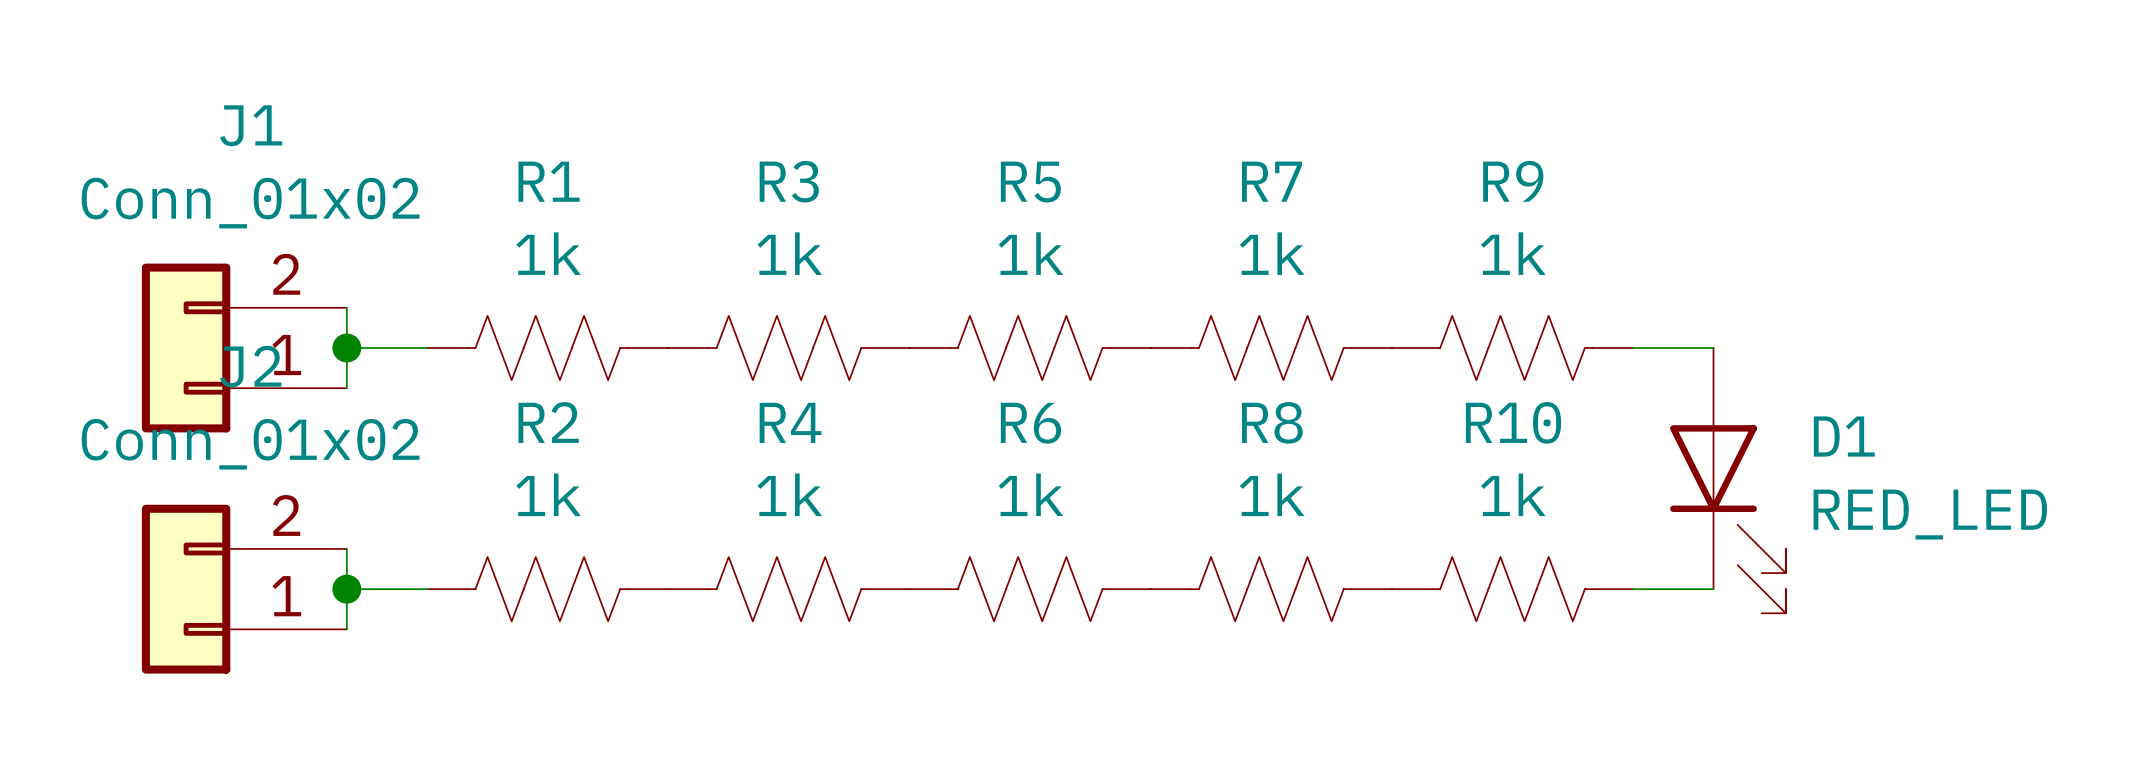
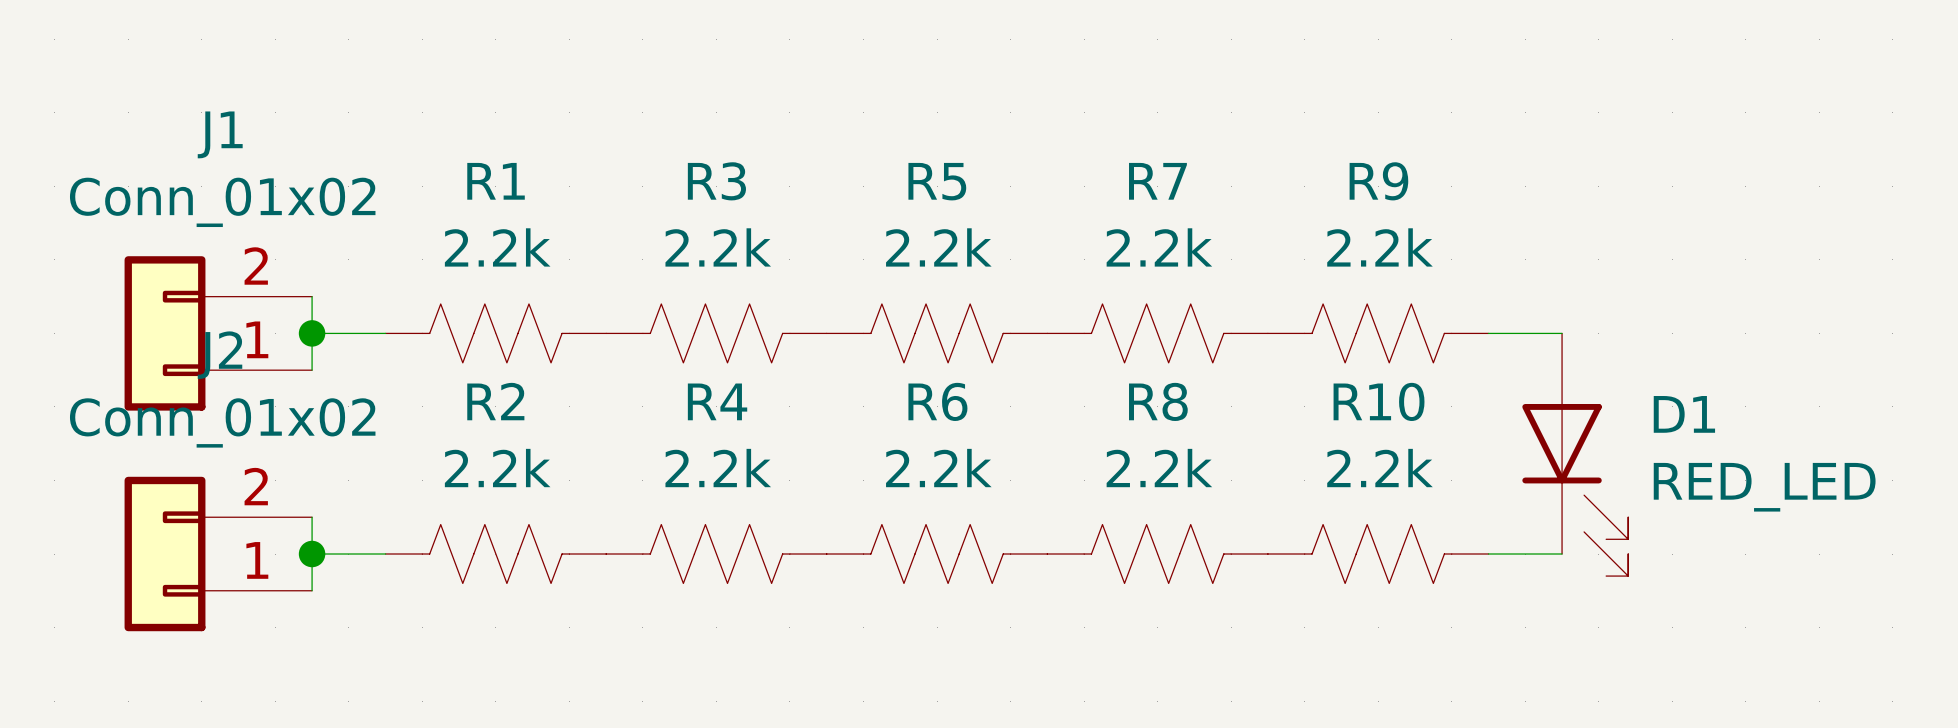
R1 value: 1k (548, 253) -> 2.2k (497, 247)
R3 value: 1k (789, 253) -> 2.2k (718, 247)
R5 value: 1k (1030, 253) -> 2.2k (938, 247)
R7 value: 1k (1272, 253) -> 2.2k (1159, 247)
R9 value: 1k (1513, 253) -> 2.2k (1379, 247)
R2 value: 1k (548, 494) -> 2.2k (497, 468)
R4 value: 1k (789, 494) -> 2.2k (718, 468)
R6 value: 1k (1030, 494) -> 2.2k (938, 468)
R8 value: 1k (1272, 494) -> 2.2k (1159, 468)
R10 value: 1k (1513, 494) -> 2.2k (1379, 468)

